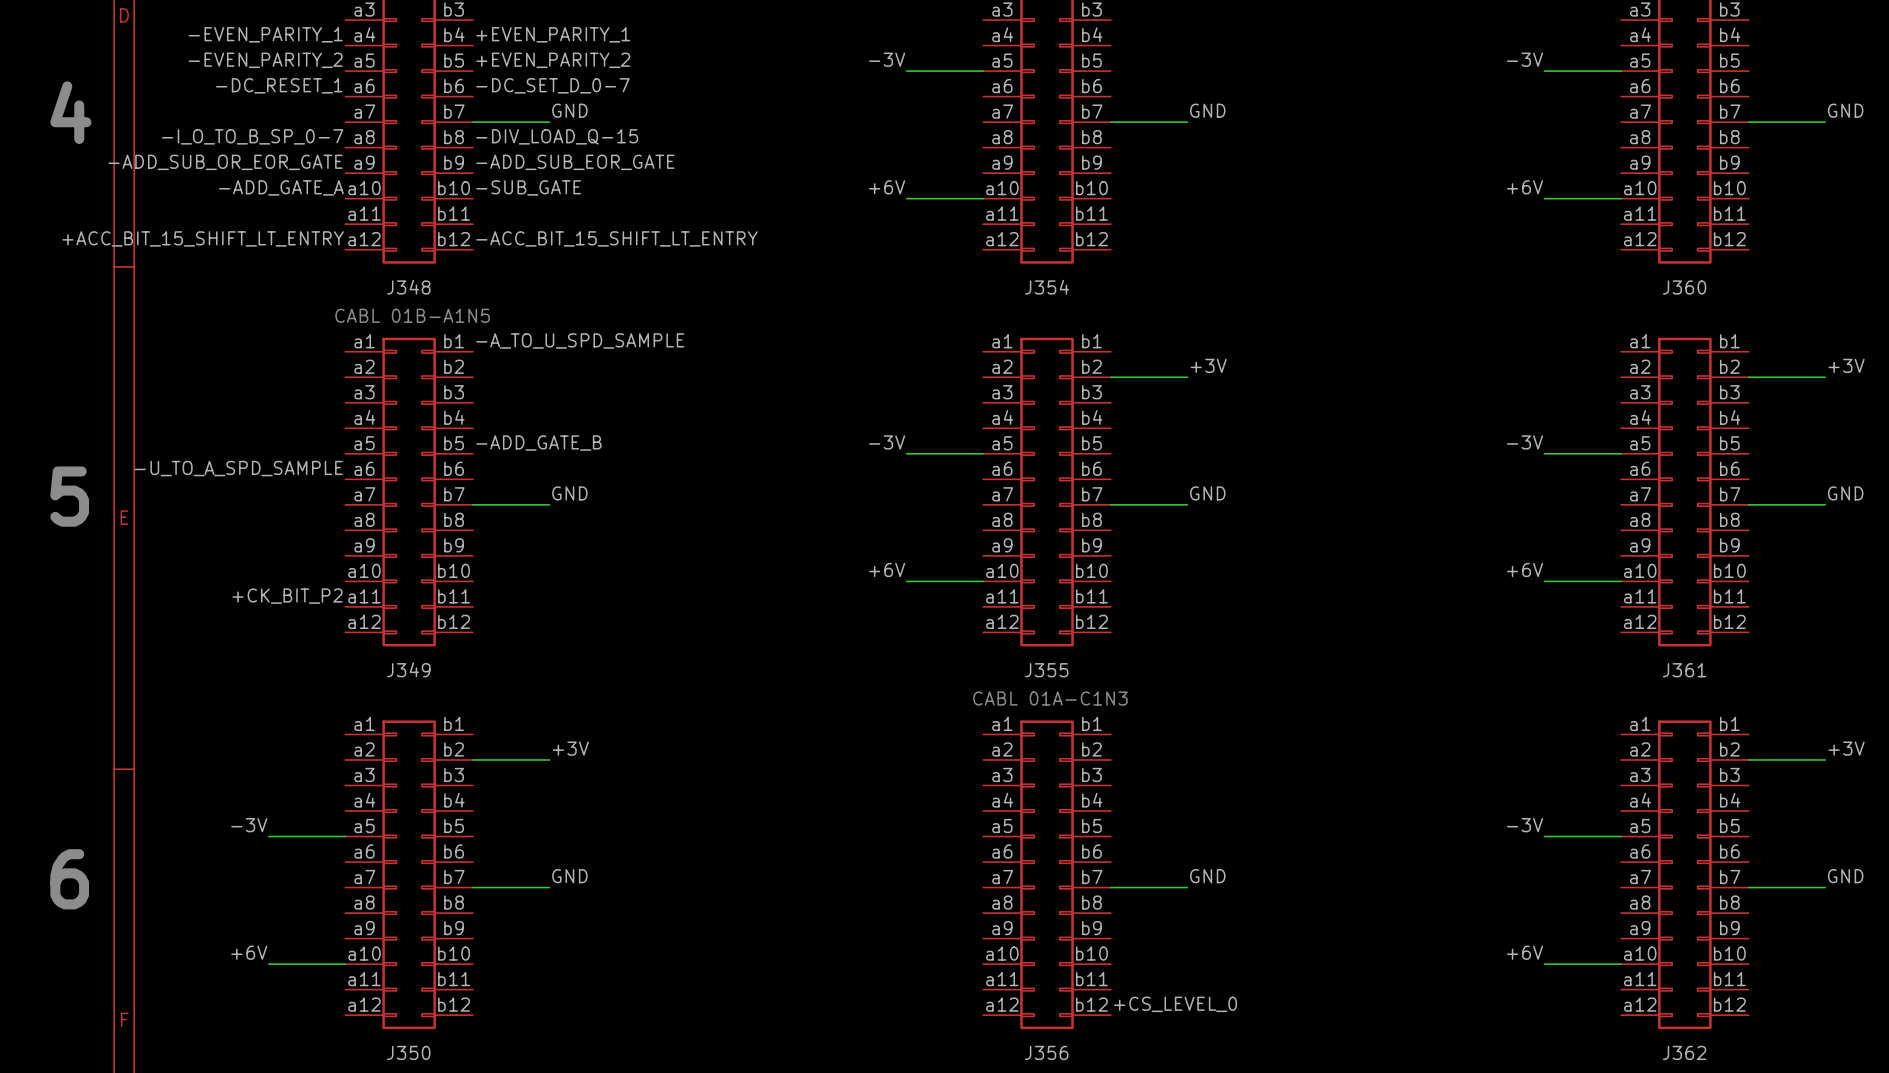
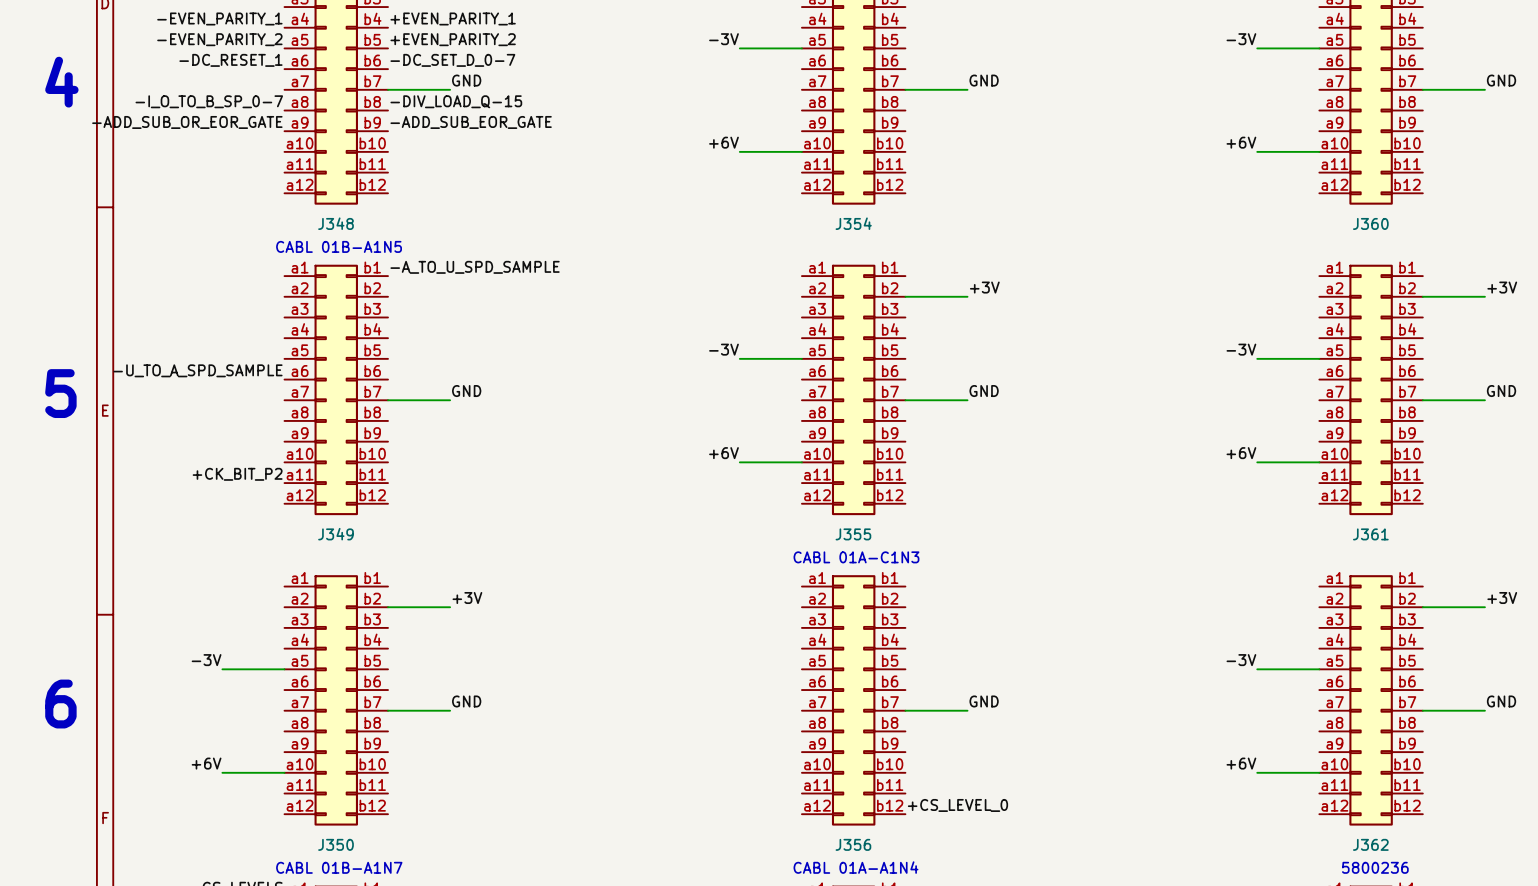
label: -ADD_GATE_A (281, 187) -> none
label: -SUB_GATE (528, 187) -> none
label: +ACC_BIT_15_SHIFT_LT_ENTRY (203, 238) -> none
label: -ACC_BIT_15_SHIFT_LT_ENTRY (617, 238) -> none
label: -ADD_GATE_B (538, 443) -> none

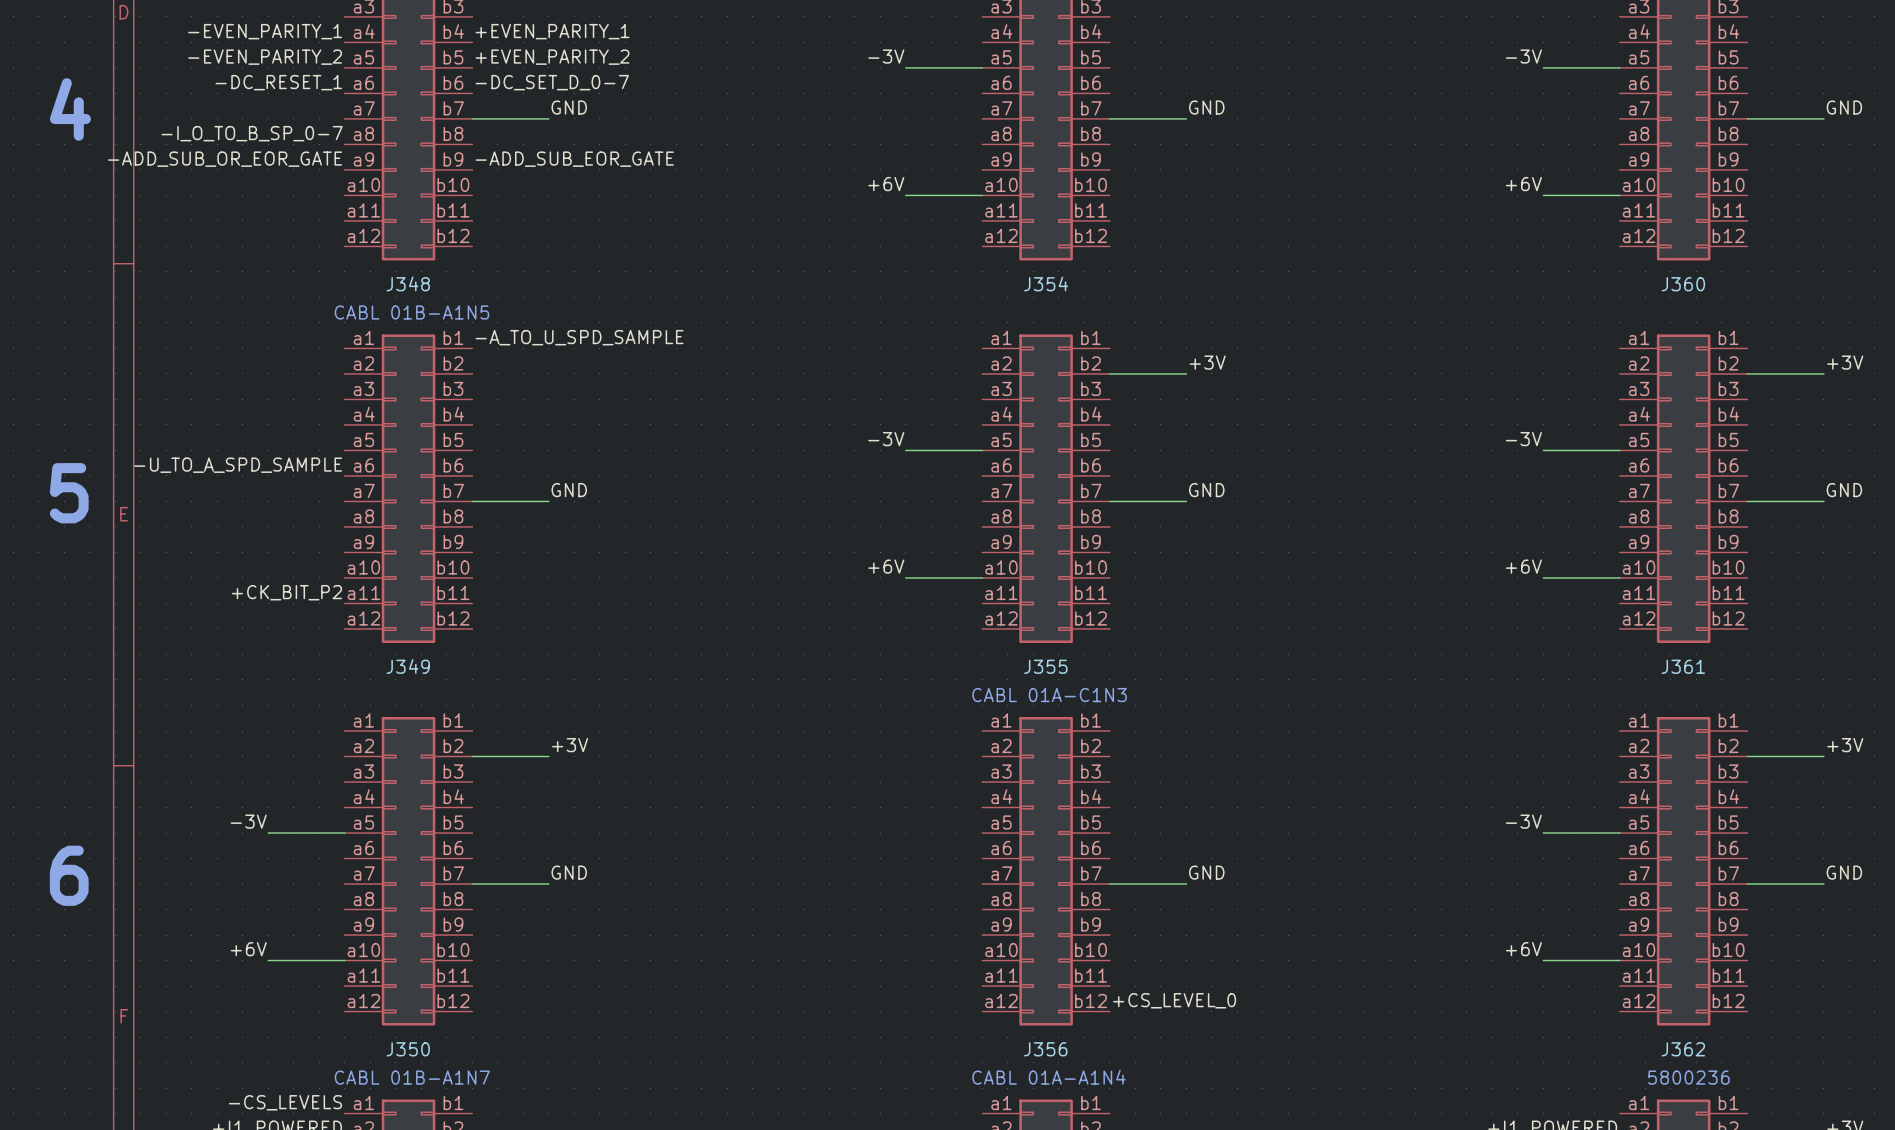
label: -DIV_LOAD_Q-15 (456, 101) -> none

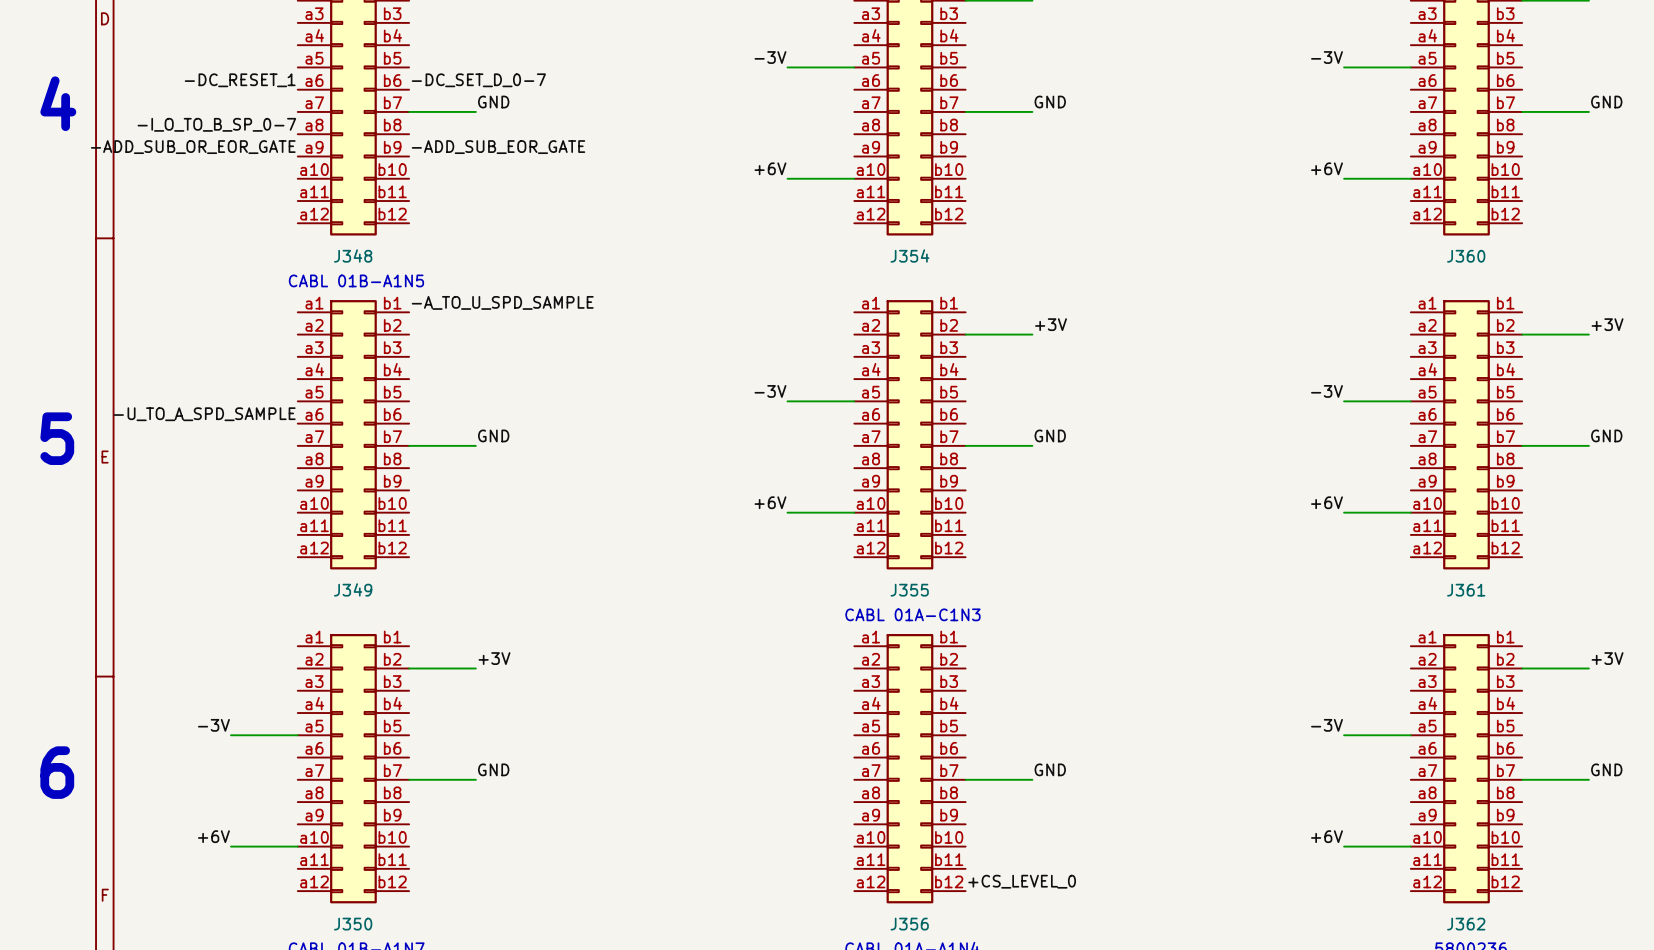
label: -EVEN_PARITY_1 (265, 31) -> none
label: +EVEN_PARITY_1 (552, 31) -> none
label: -EVEN_PARITY_2 (265, 57) -> none
label: +EVEN_PARITY_2 (552, 57) -> none
label: +CK_BIT_P2 (286, 592) -> none

